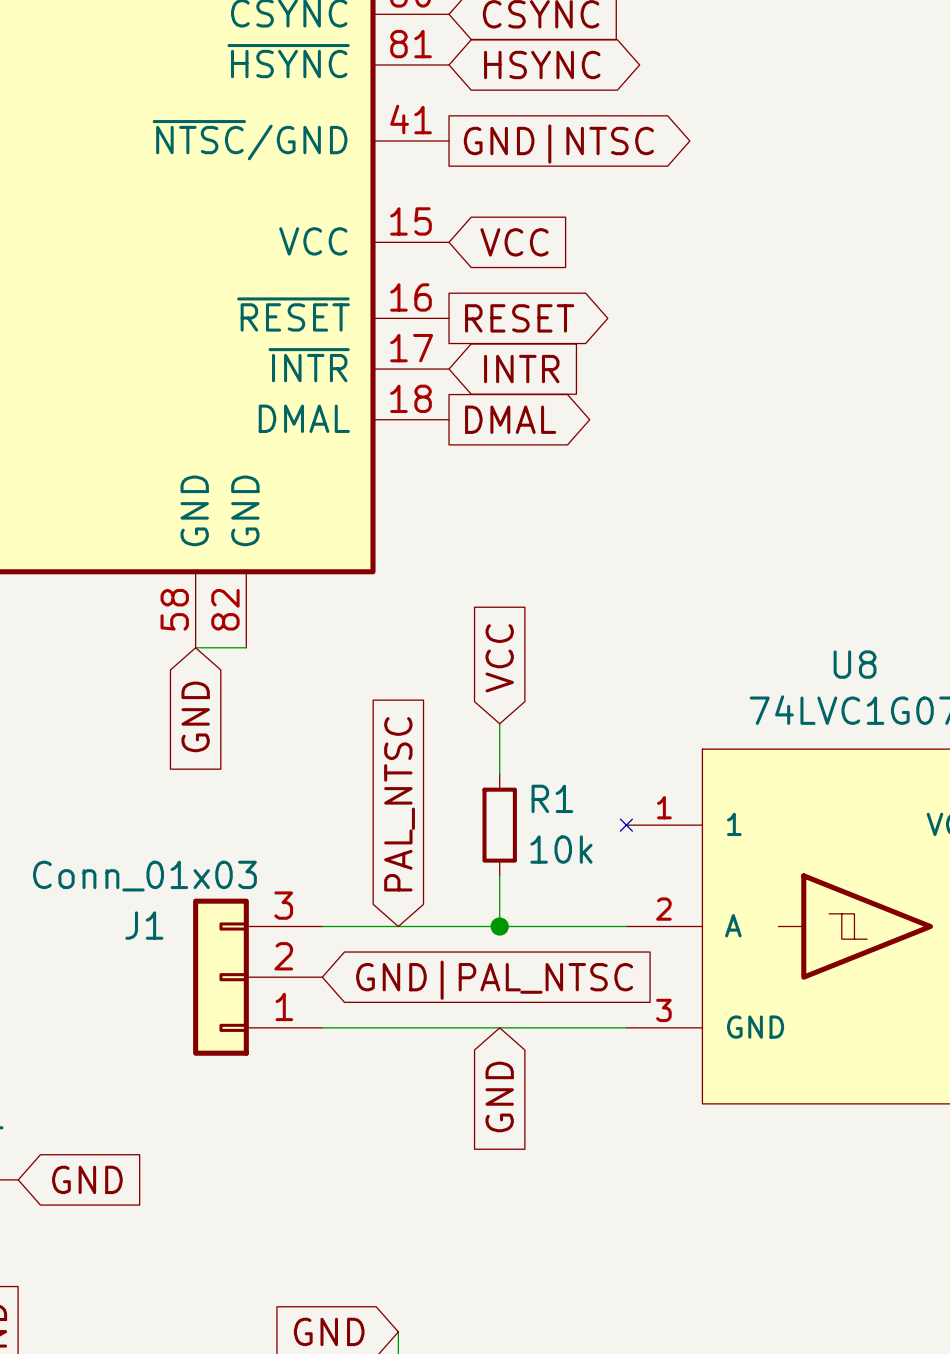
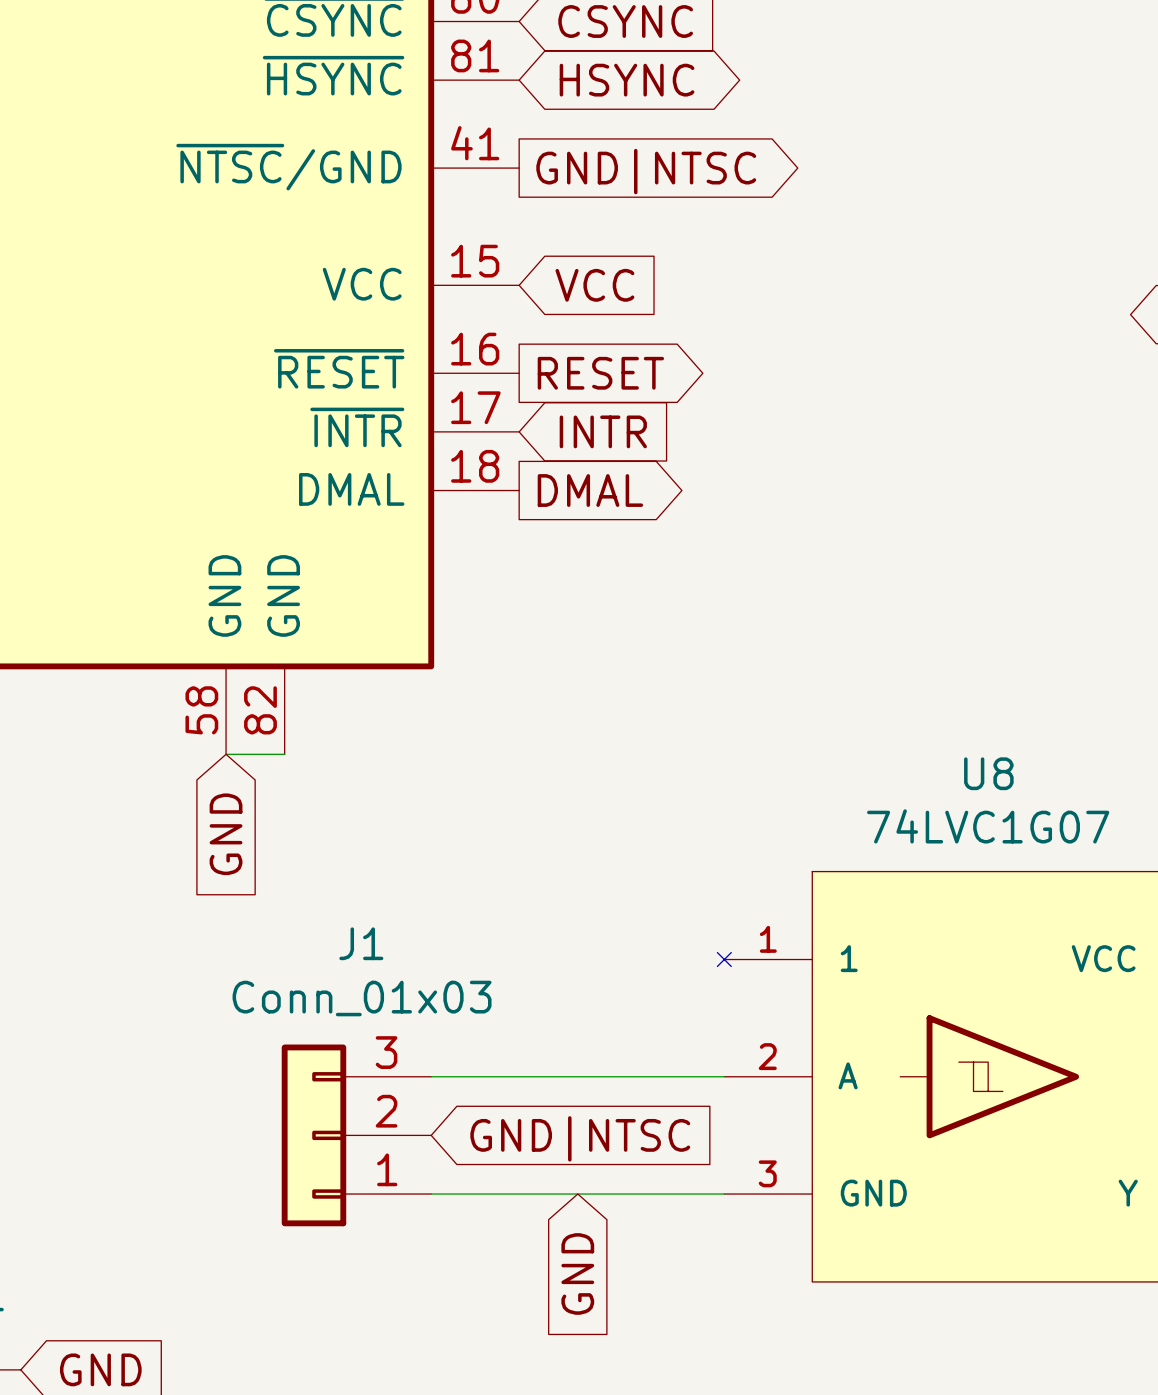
global label: VCC (499, 658) -> none
wire: (499, 723) (499, 774) -> none
global label: PAL_NTSC (399, 804) -> none
R1: 10k (499, 825) -> none
wire: (499, 875) (499, 926) -> none
J1 value position: Conn_01x03 (144, 876) -> Conn_01x03 (362, 998)
J1 name position: J1 (144, 925) -> J1 (361, 943)
junction: (499, 926) -> none
J1 position: (257, 977) -> (356, 1135)
global label: GND|PAL_NTSC (494, 980) -> GND|NTSC (580, 1138)

